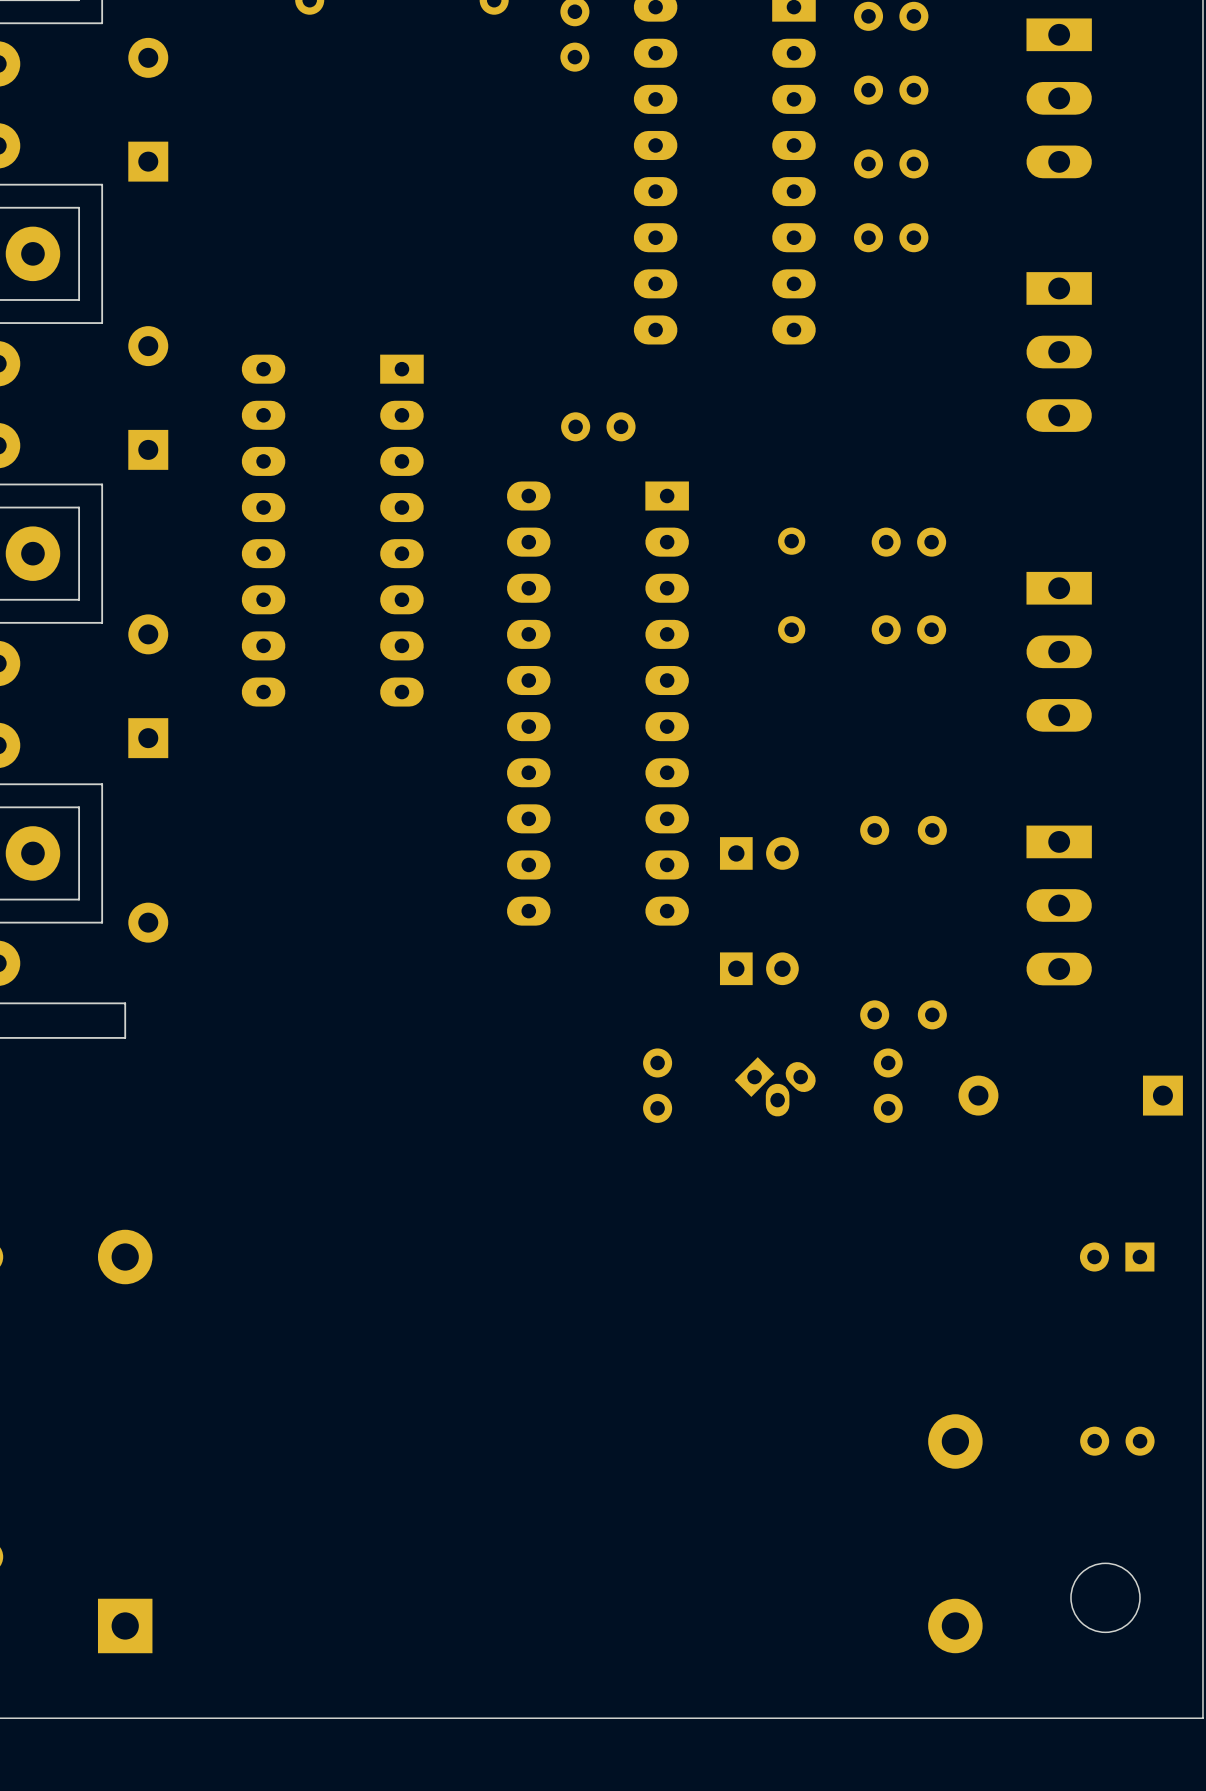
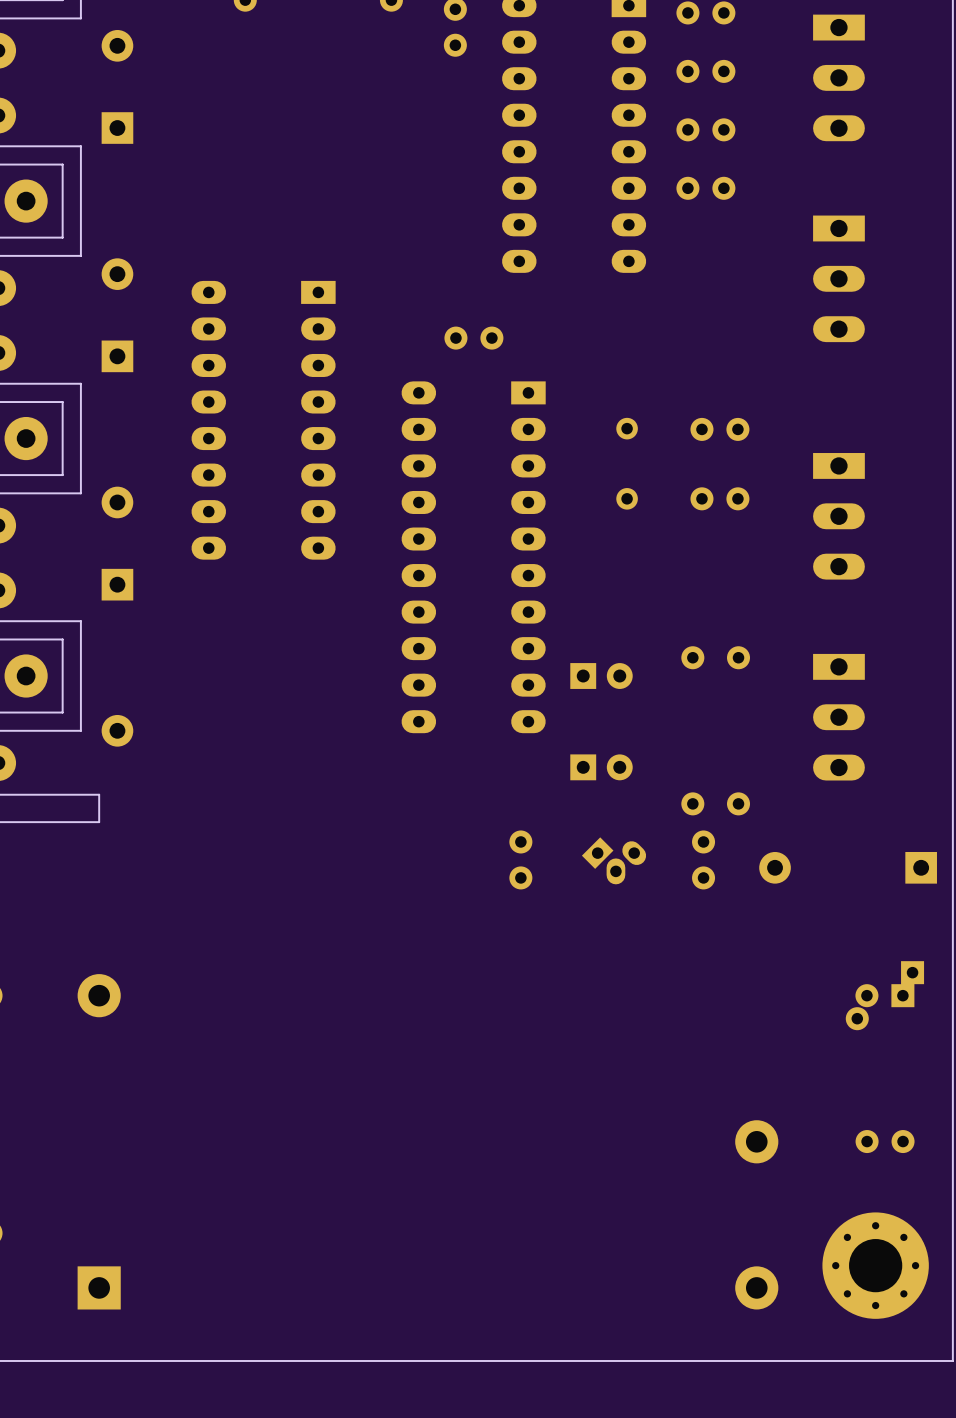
part footprint: [1079, 1242, 1155, 1272] -> [845, 961, 925, 1031]
round board edge: [1070, 1562, 1141, 1633] -> none
part: none -> (875, 1265)

